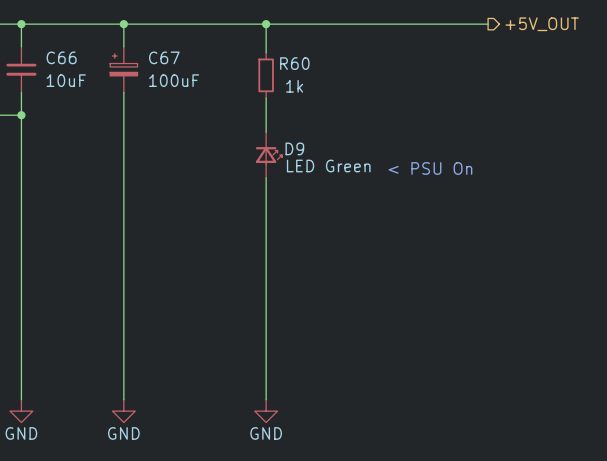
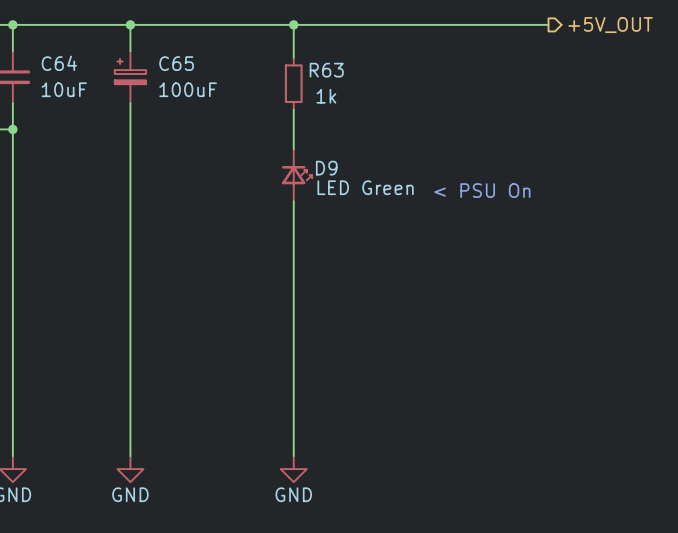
C66 name: C66 (61, 57) -> C64 (59, 63)
C67 name: C67 (164, 57) -> C65 (176, 63)
R60 name: R60 (294, 63) -> R63 (326, 70)

